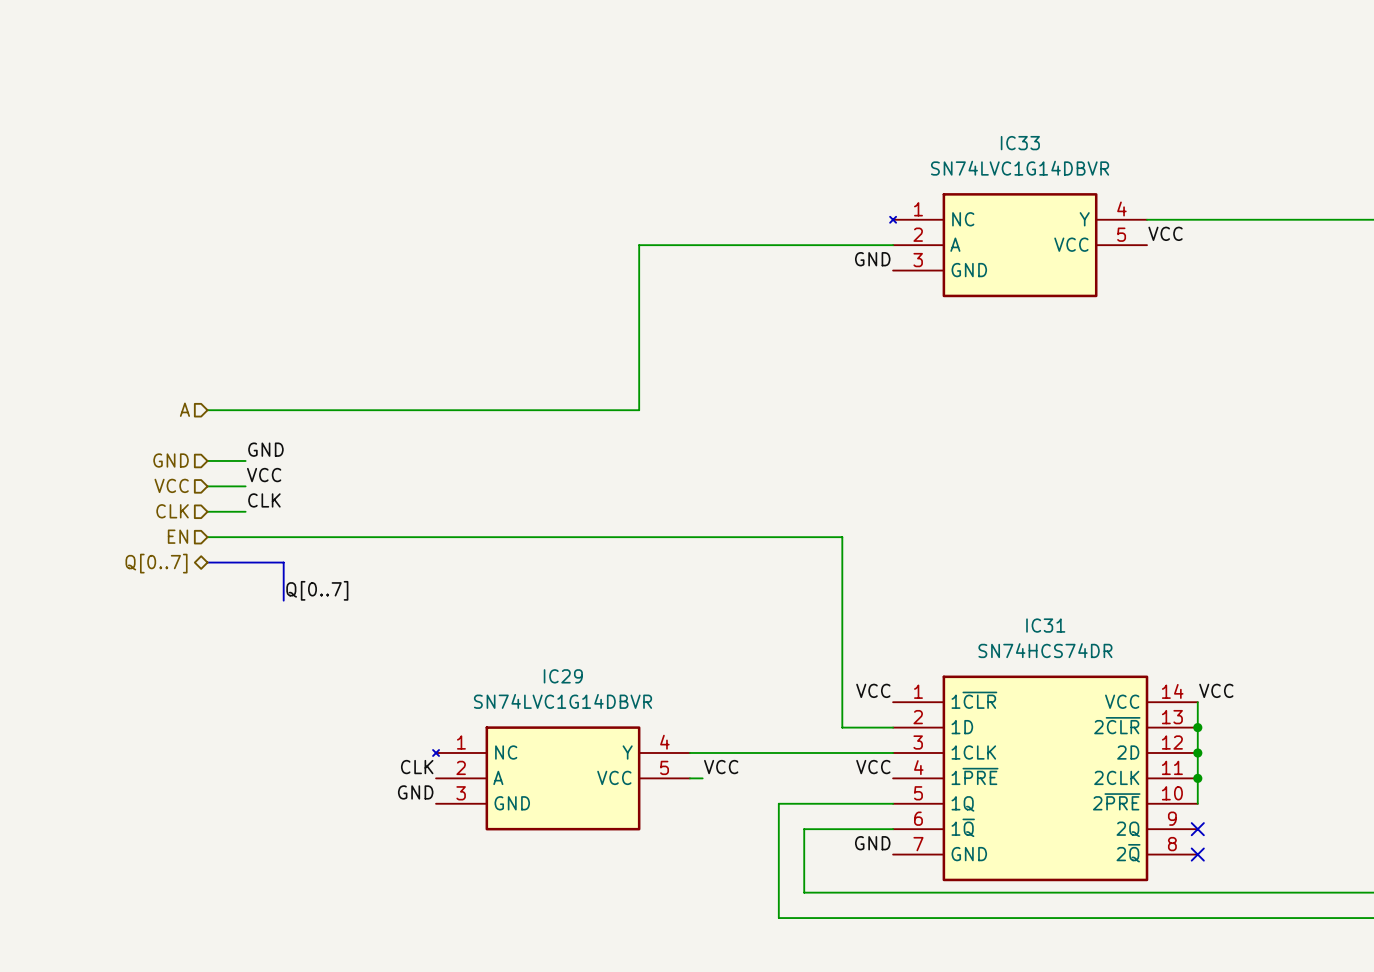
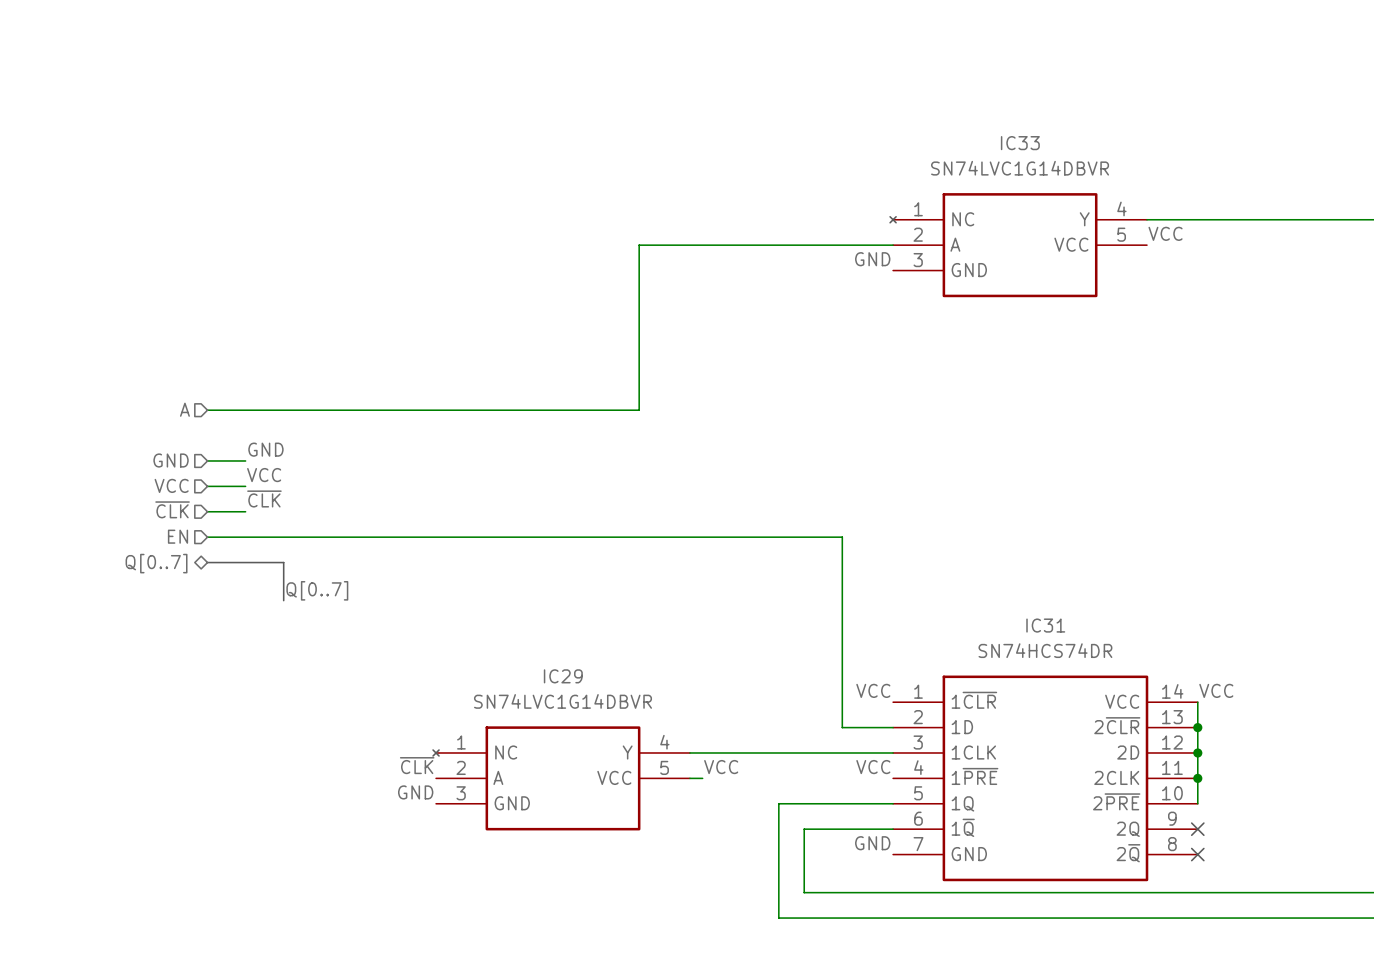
label: CLK (264, 500) -> ~{CLK} (264, 498)
hierarchical label: CLK (172, 511) -> ~{CLK} (172, 509)
label: CLK (417, 767) -> ~{CLK} (417, 765)

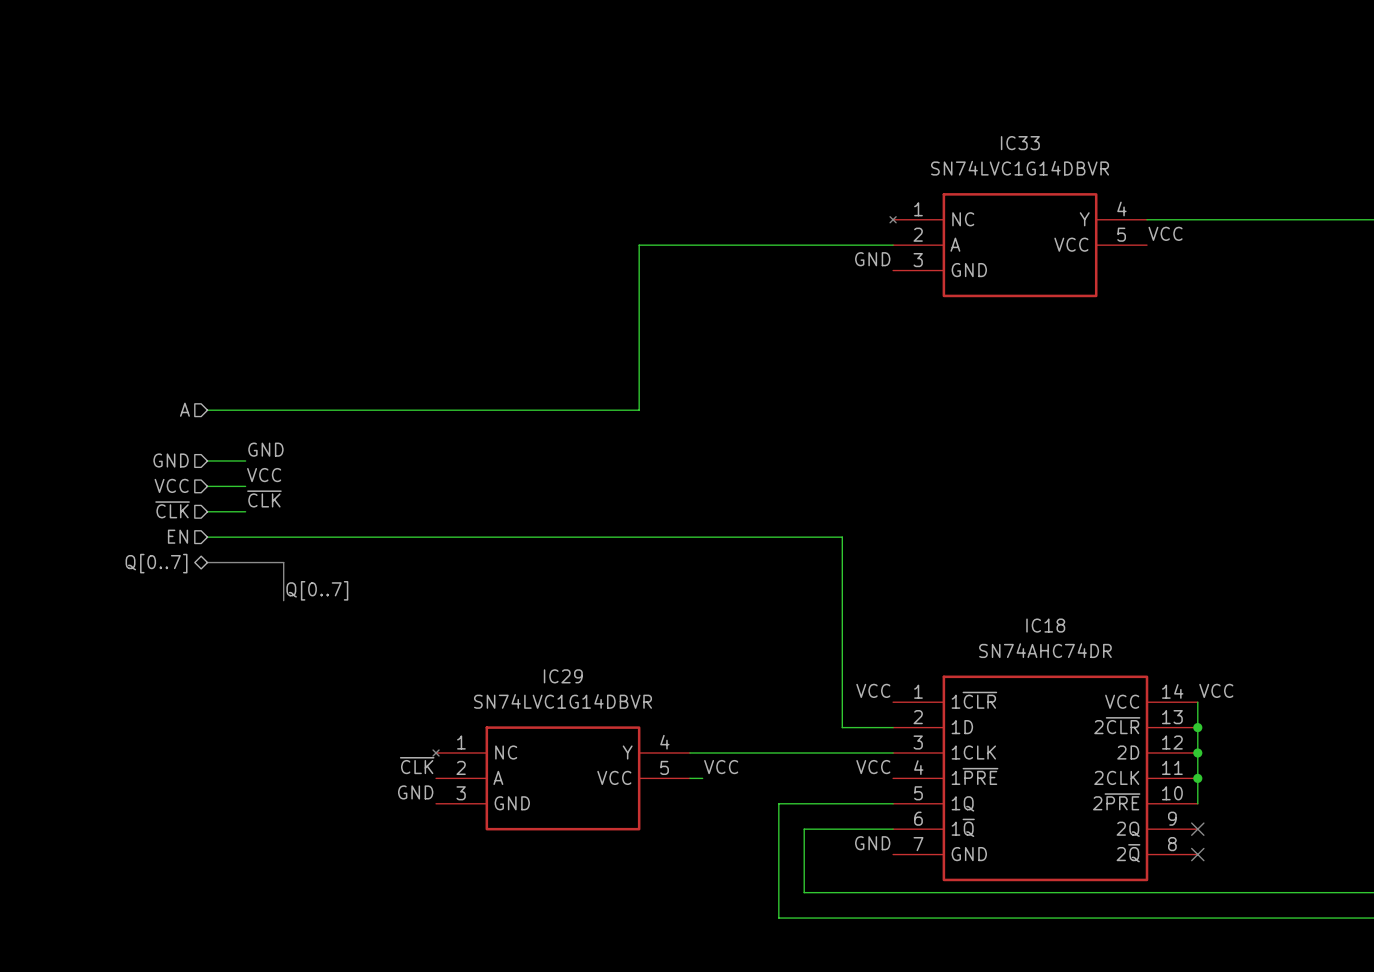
IC31 name: IC31 (1045, 625) -> IC18 (1045, 625)
IC31 value: SN74HCS74DR (1045, 650) -> SN74AHC74DR (1045, 650)

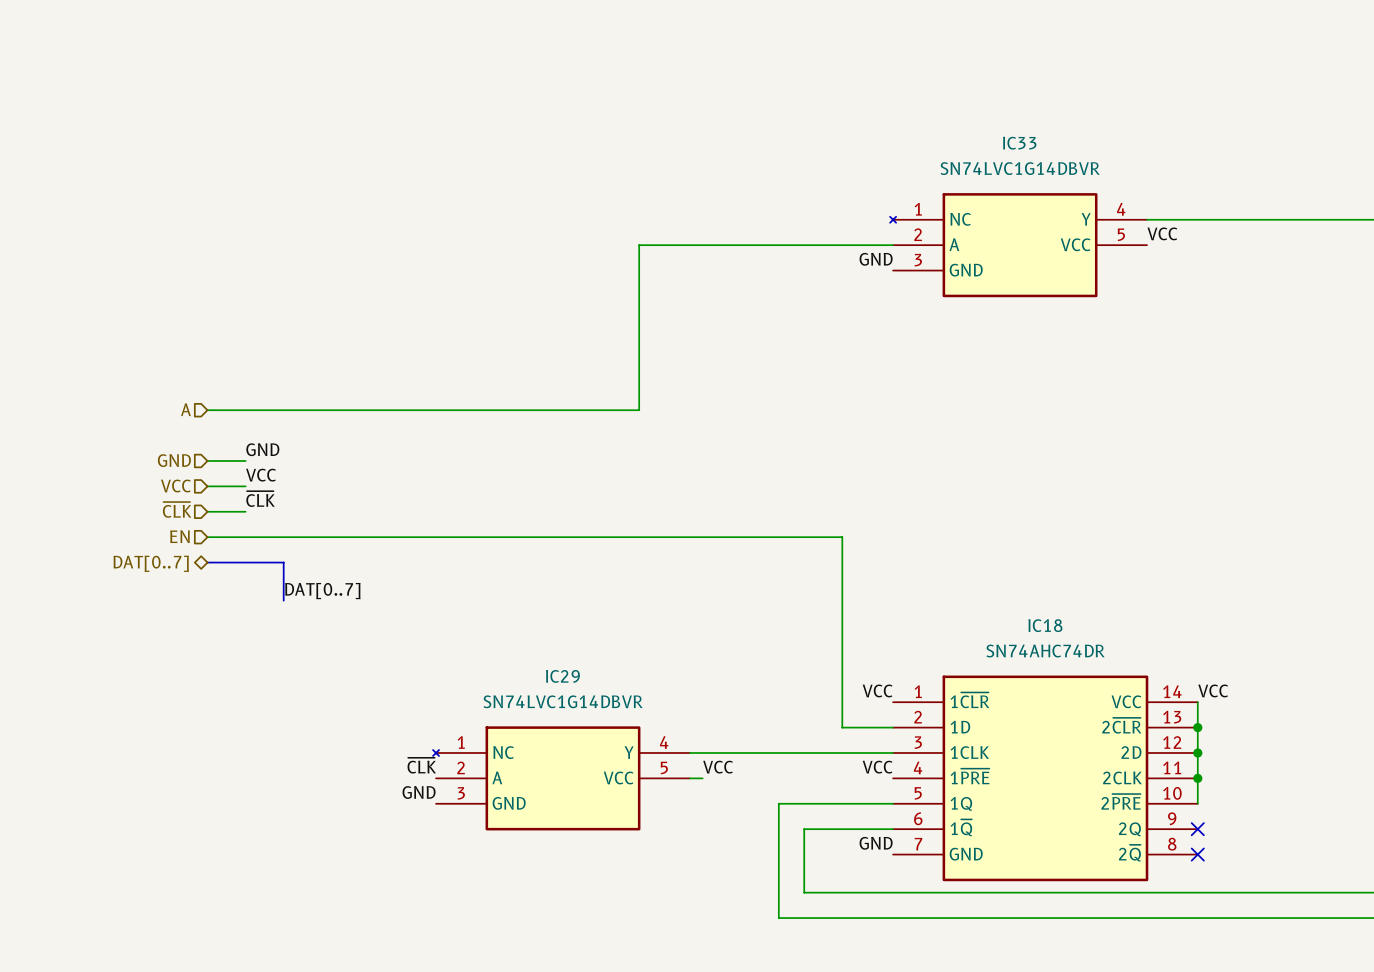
hierarchical label: Q[0..7] (156, 563) -> DAT[0..7] (151, 563)
label: Q[0..7] (317, 590) -> DAT[0..7] (322, 591)

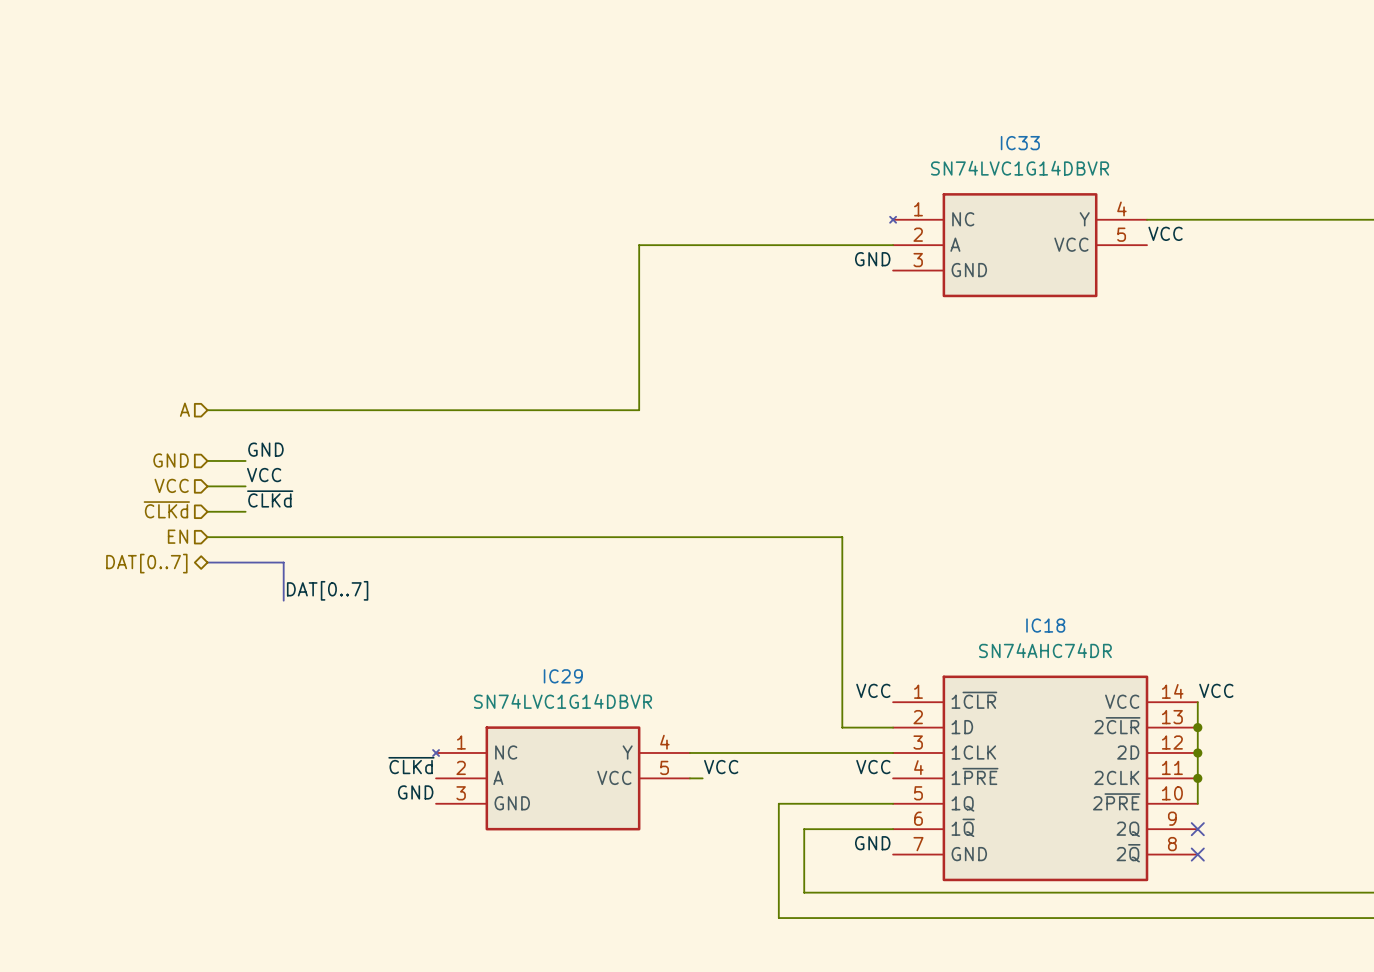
label: ~{CLK} (260, 499) -> ~{CLKd} (270, 498)
hierarchical label: ~{CLK} (177, 509) -> ~{CLKd} (166, 509)
label: ~{CLK} (421, 765) -> ~{CLKd} (411, 765)

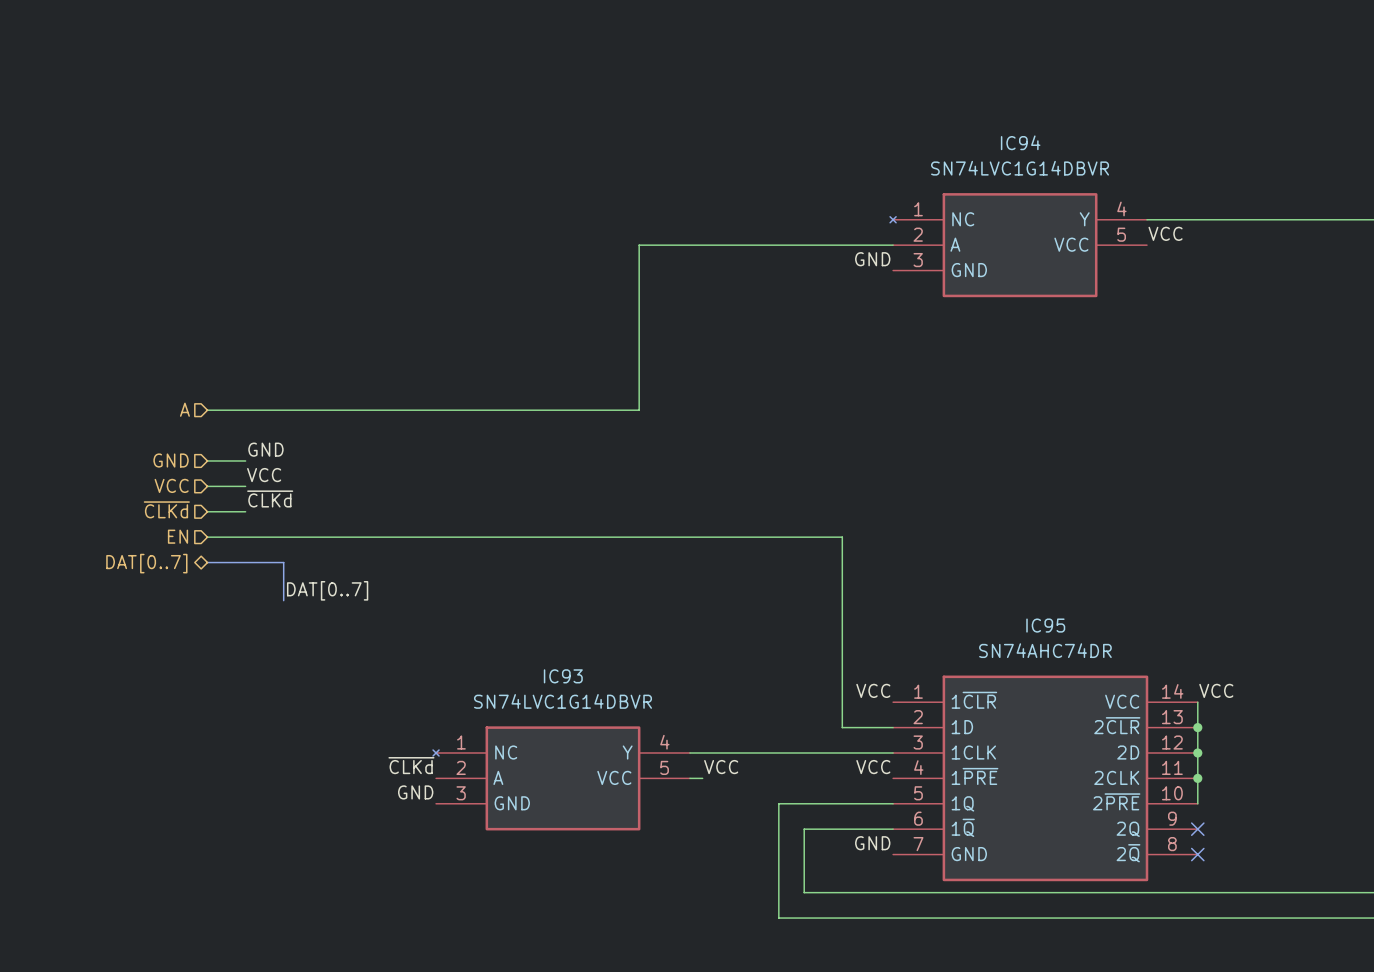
IC33 name: IC33 (1020, 143) -> IC94 (1020, 142)
IC18 name: IC18 (1045, 625) -> IC95 (1045, 625)
IC29 name: IC29 (563, 676) -> IC93 (563, 676)

